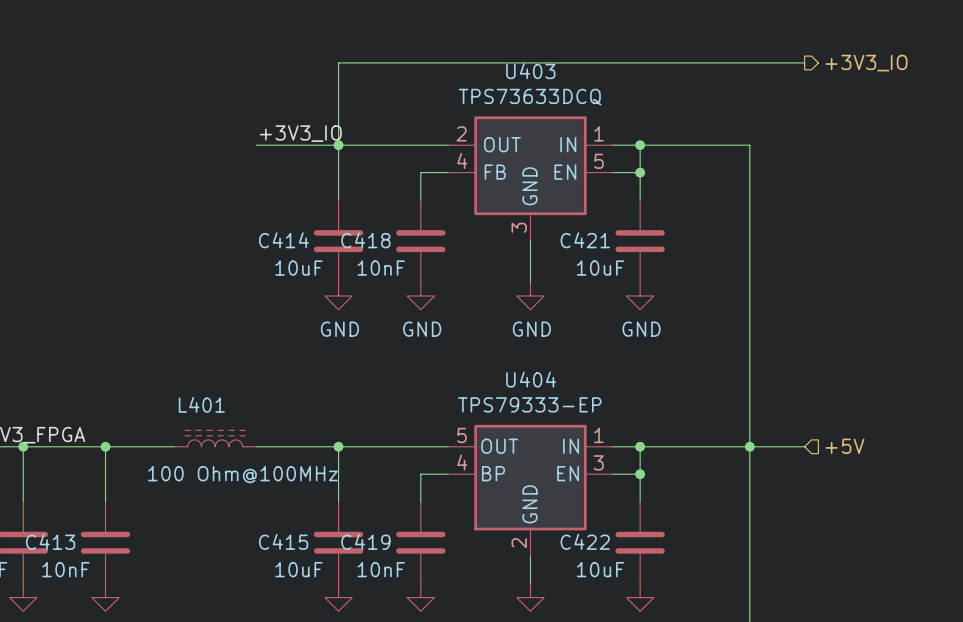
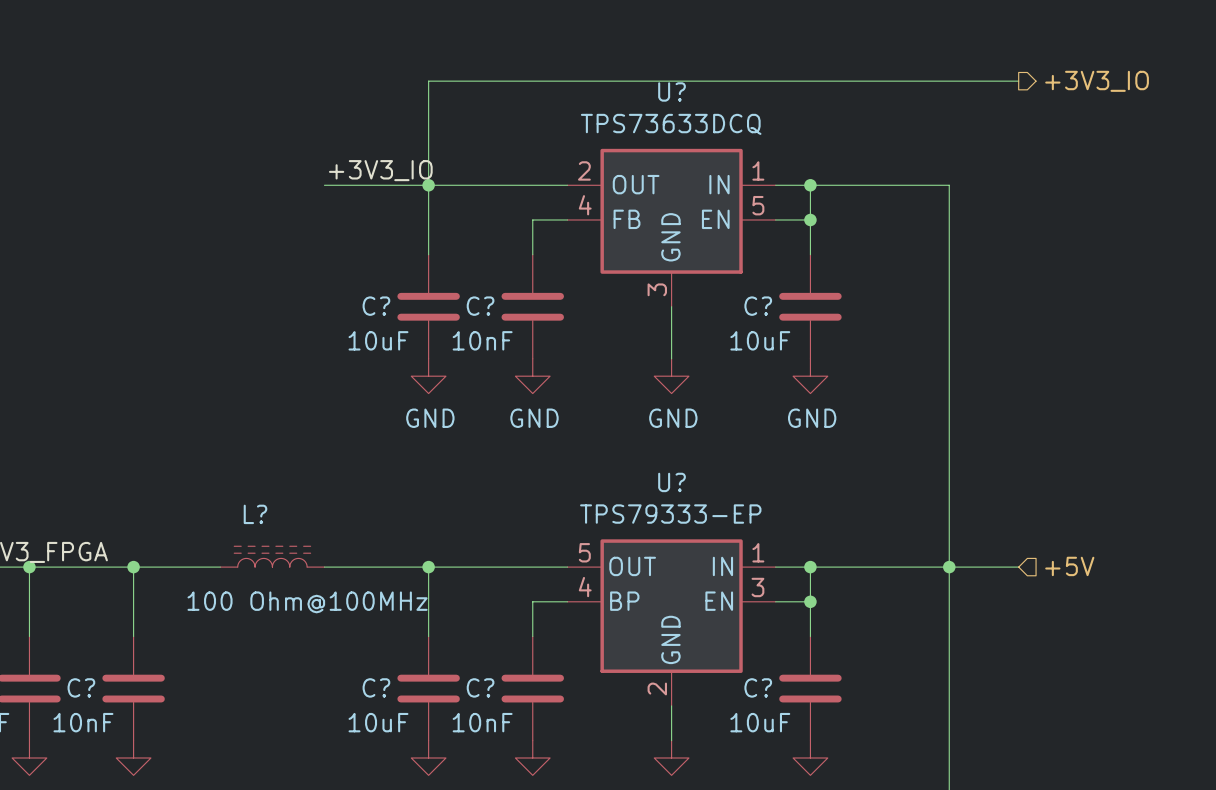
U403 name: U403 (530, 71) -> U? (672, 91)
C414 name: C414 (283, 240) -> C? (376, 306)
C418 name: C418 (365, 240) -> C? (480, 306)
C421 name: C421 (585, 240) -> C? (758, 306)
U404 name: U404 (531, 379) -> U? (672, 482)
L401 name: L401 (201, 404) -> L? (255, 514)
C413 name: C413 (50, 541) -> C? (81, 687)
C415 name: C415 (283, 541) -> C? (376, 687)
C419 name: C419 (365, 541) -> C? (480, 687)
C422 name: C422 (585, 541) -> C? (758, 687)

